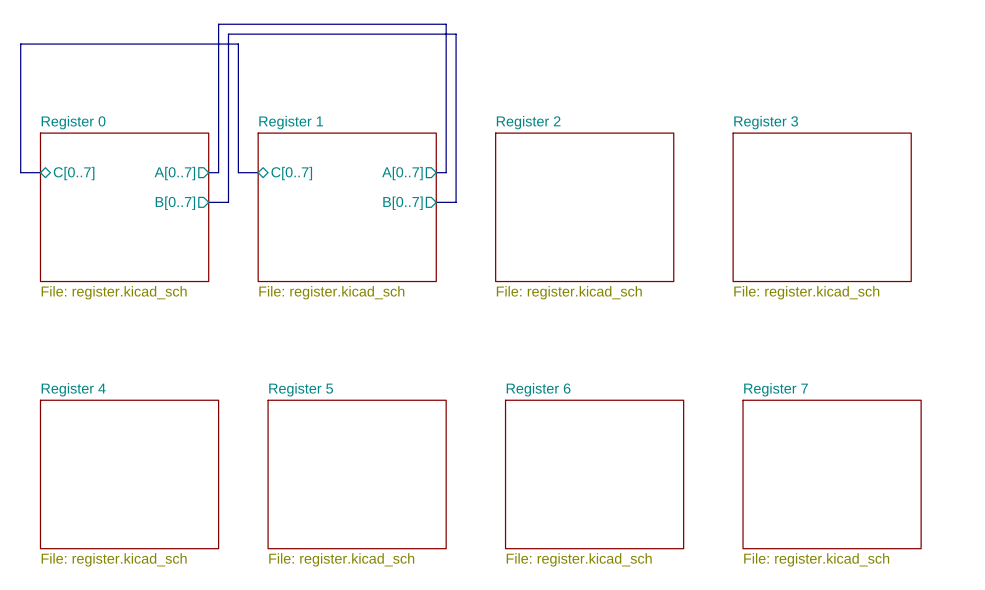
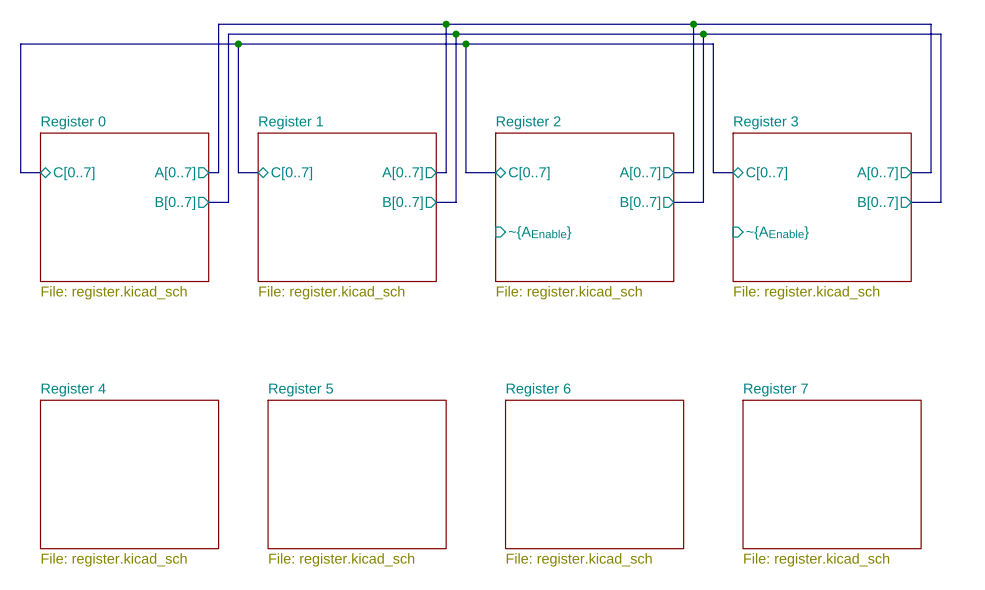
bus: none -> (446, 24) (931, 24) (931, 172) (911, 172)
junction: none -> (446, 24)
bus: none -> (693, 24) (693, 172) (673, 172)
junction: none -> (693, 24)
bus: none -> (456, 34) (940, 34) (940, 202) (911, 202)
junction: none -> (456, 34)
bus: none -> (703, 34) (703, 202) (673, 202)
junction: none -> (703, 34)
bus: none -> (238, 44) (713, 44) (713, 172) (733, 172)
junction: none -> (238, 44)
bus: none -> (465, 44) (465, 172) (495, 172)
junction: none -> (465, 44)
sheet pin: none -> C[0..7] (529, 173)
sheet pin: none -> A[0..7] (639, 173)
sheet pin: none -> C[0..7] (766, 173)
sheet pin: none -> A[0..7] (877, 173)
sheet pin: none -> B[0..7] (640, 203)
sheet pin: none -> B[0..7] (877, 203)
sheet pin: none -> ~{AEnable} (540, 232)
sheet pin: none -> ~{AEnable} (777, 232)

